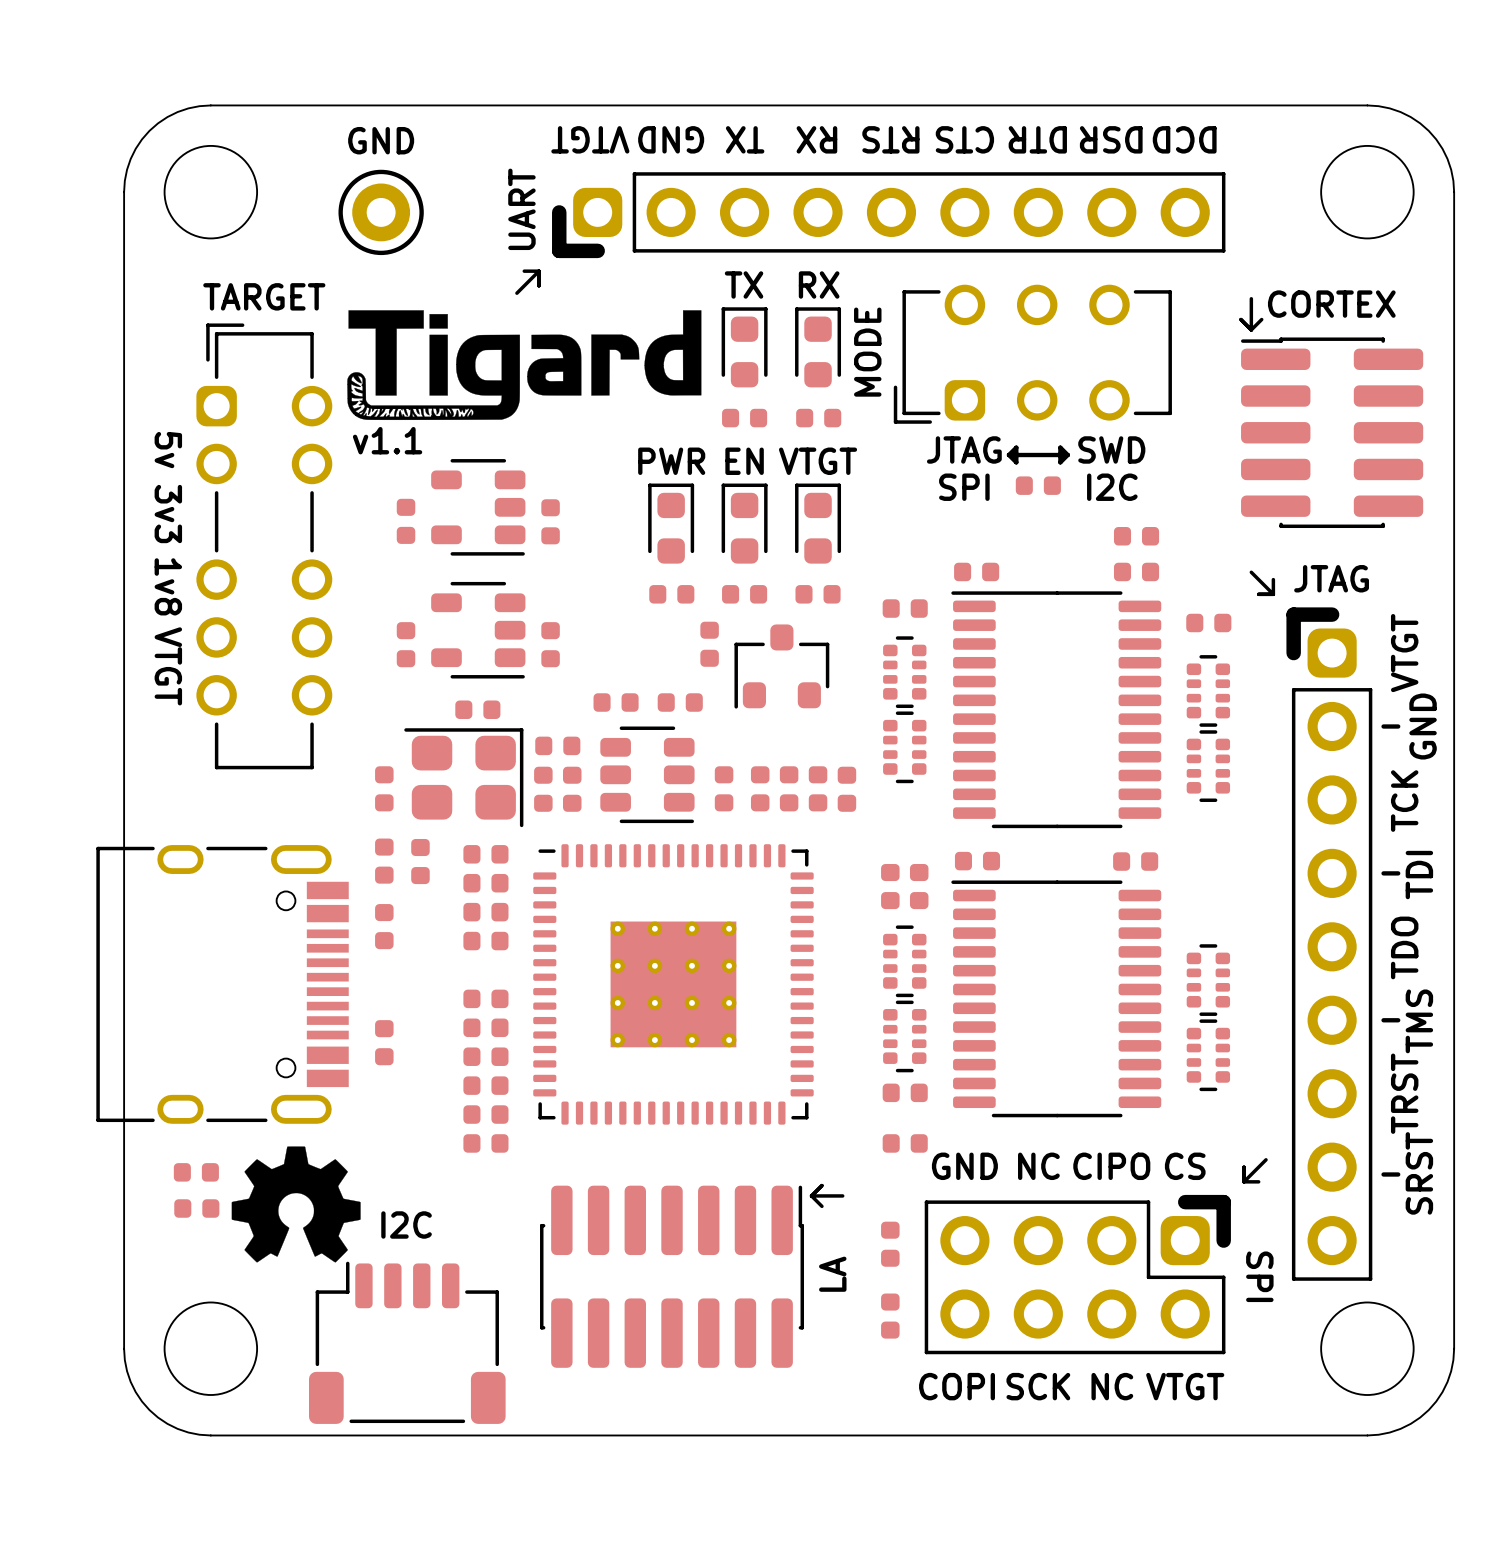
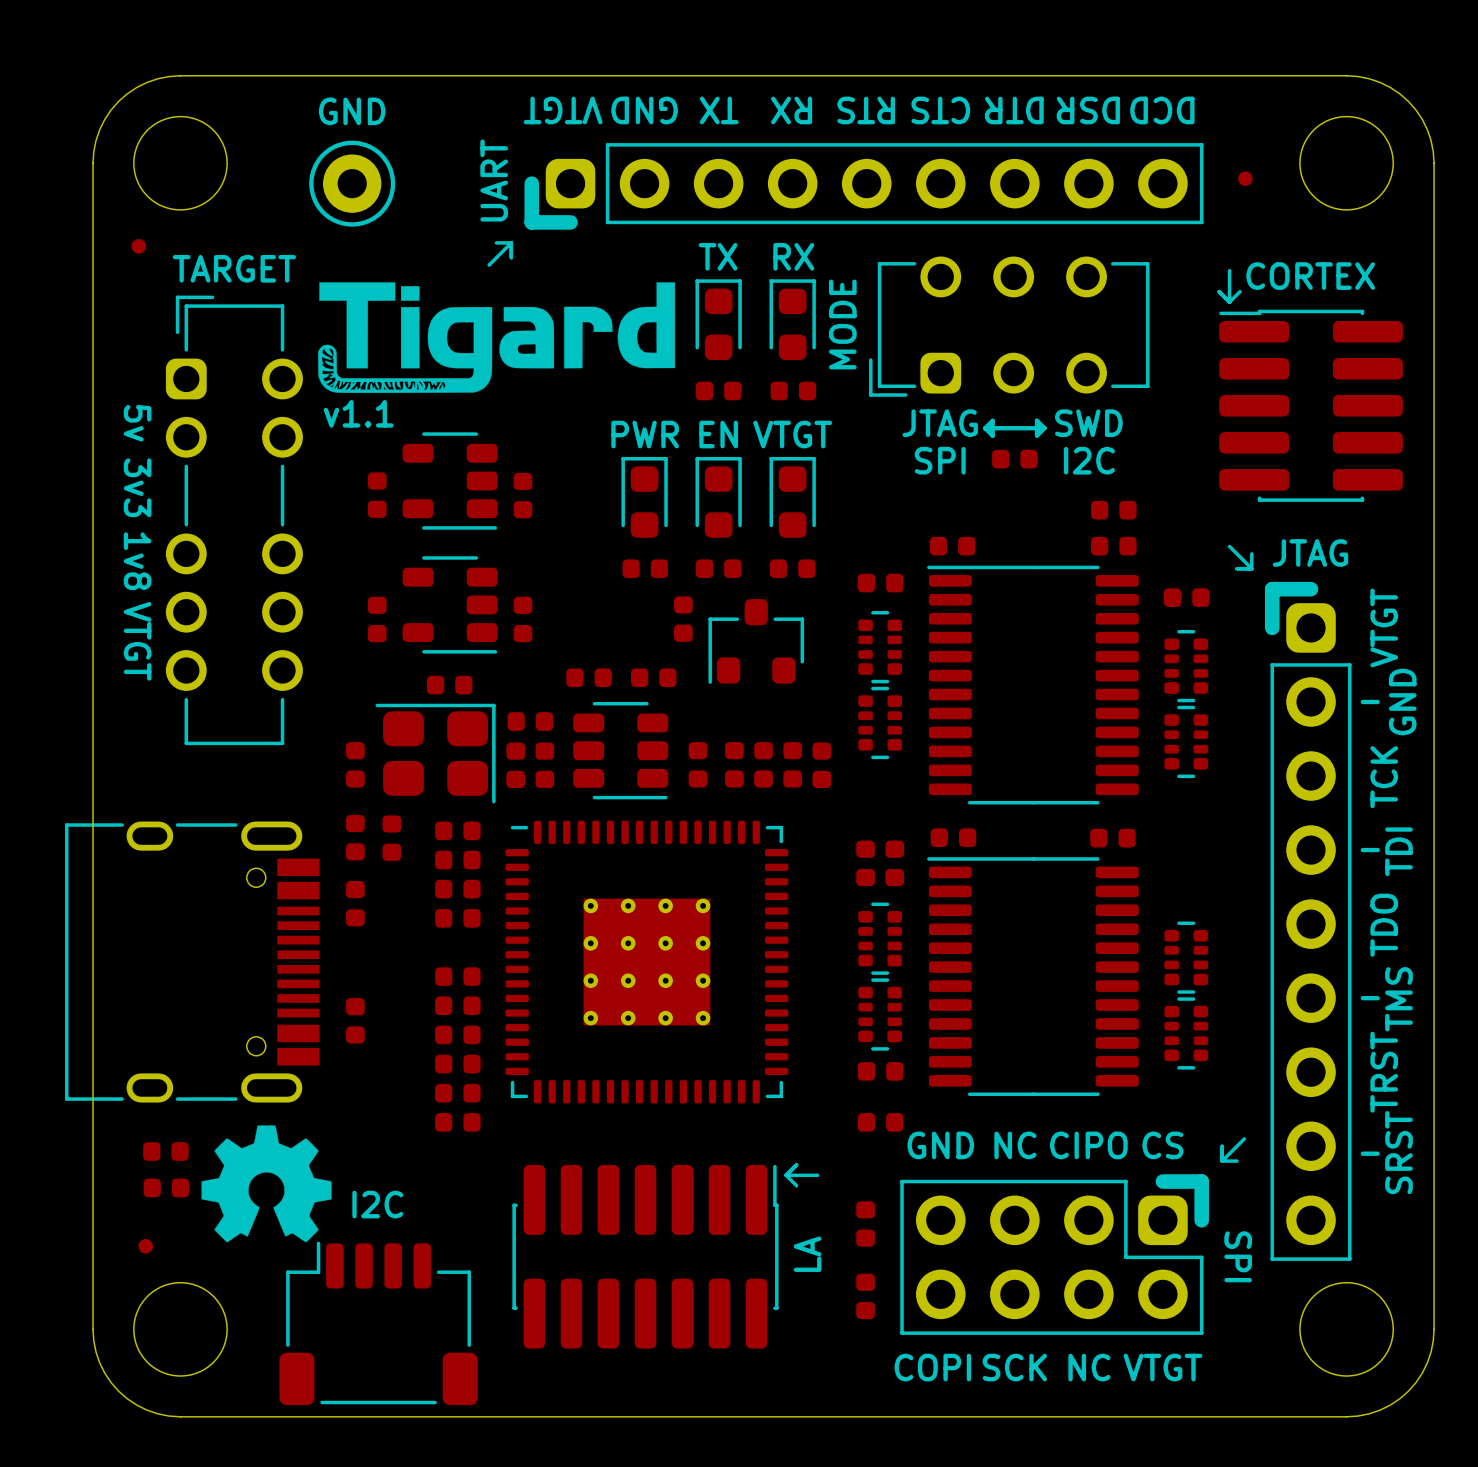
part: none -> (1245, 178)
part: none -> (138, 246)
part: none -> (145, 1246)

